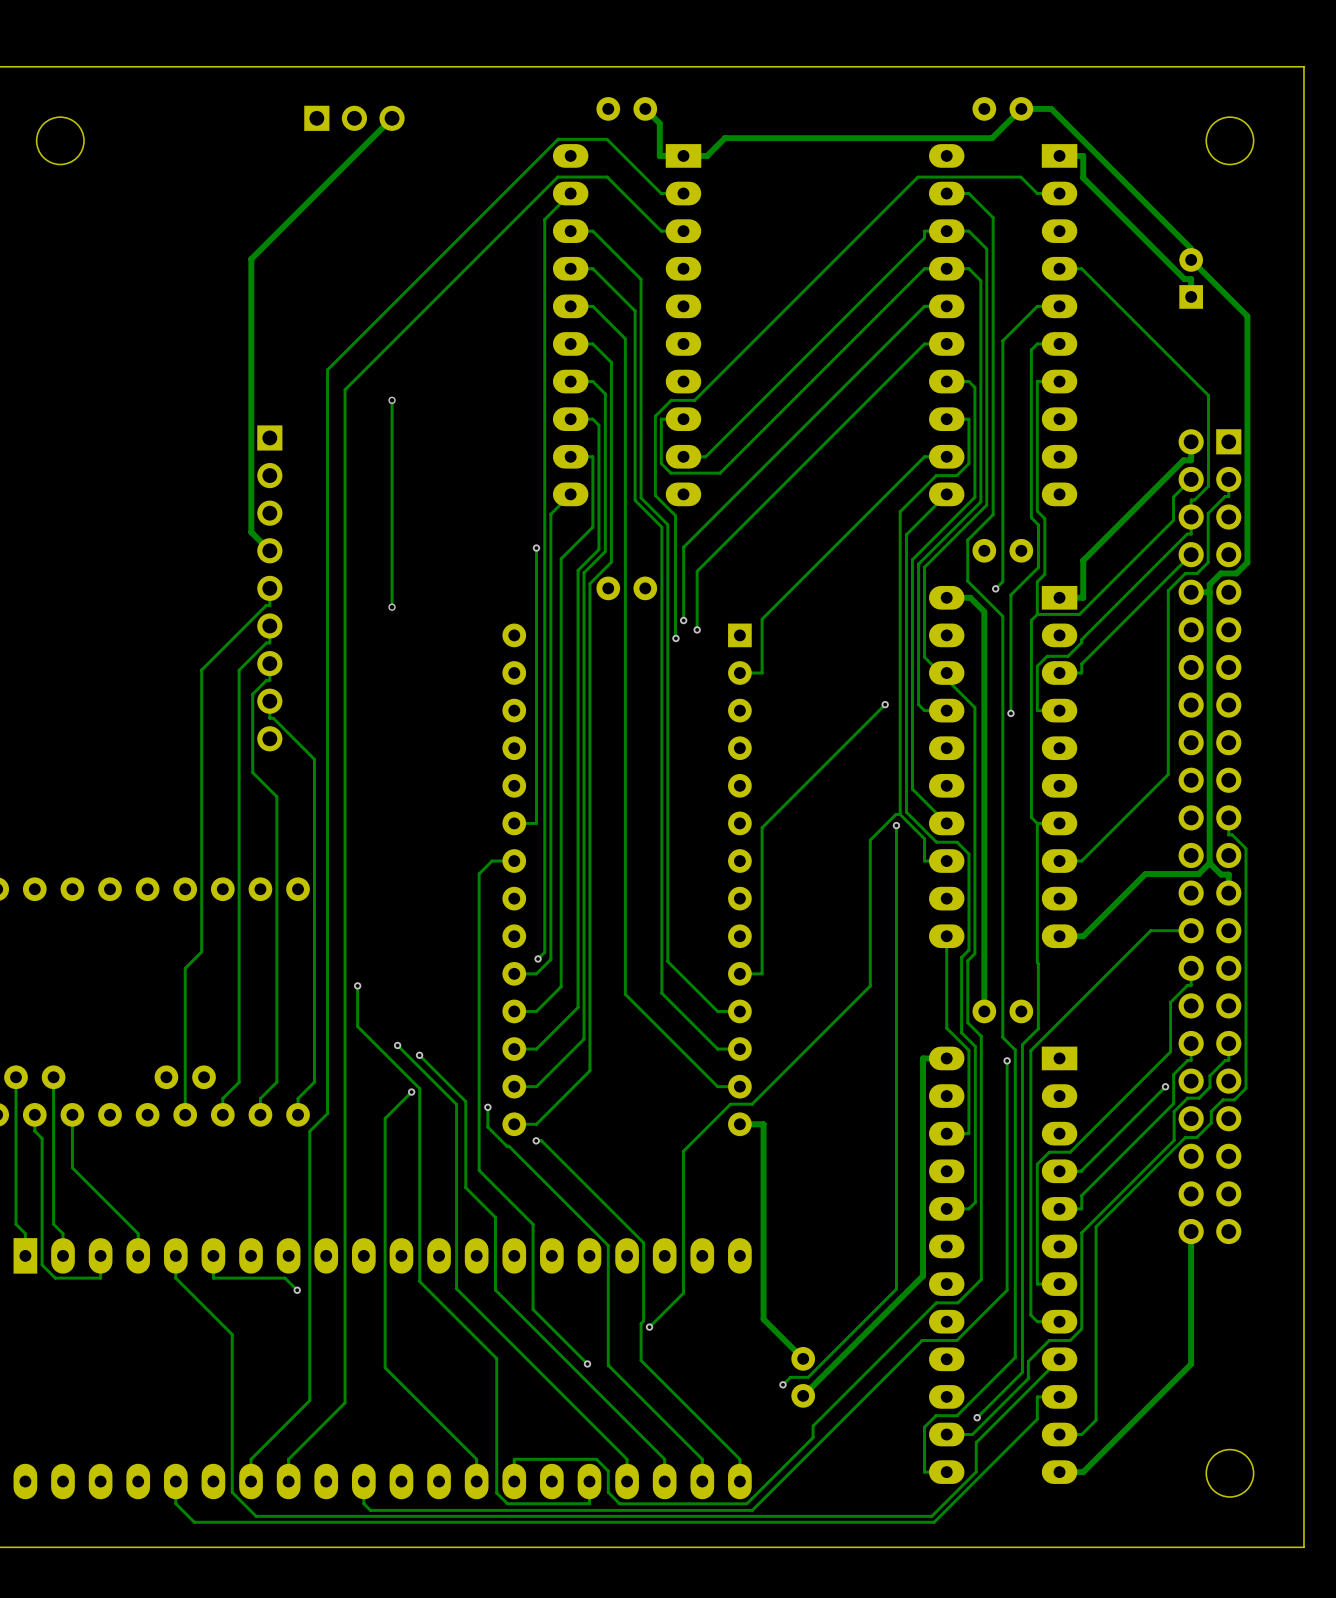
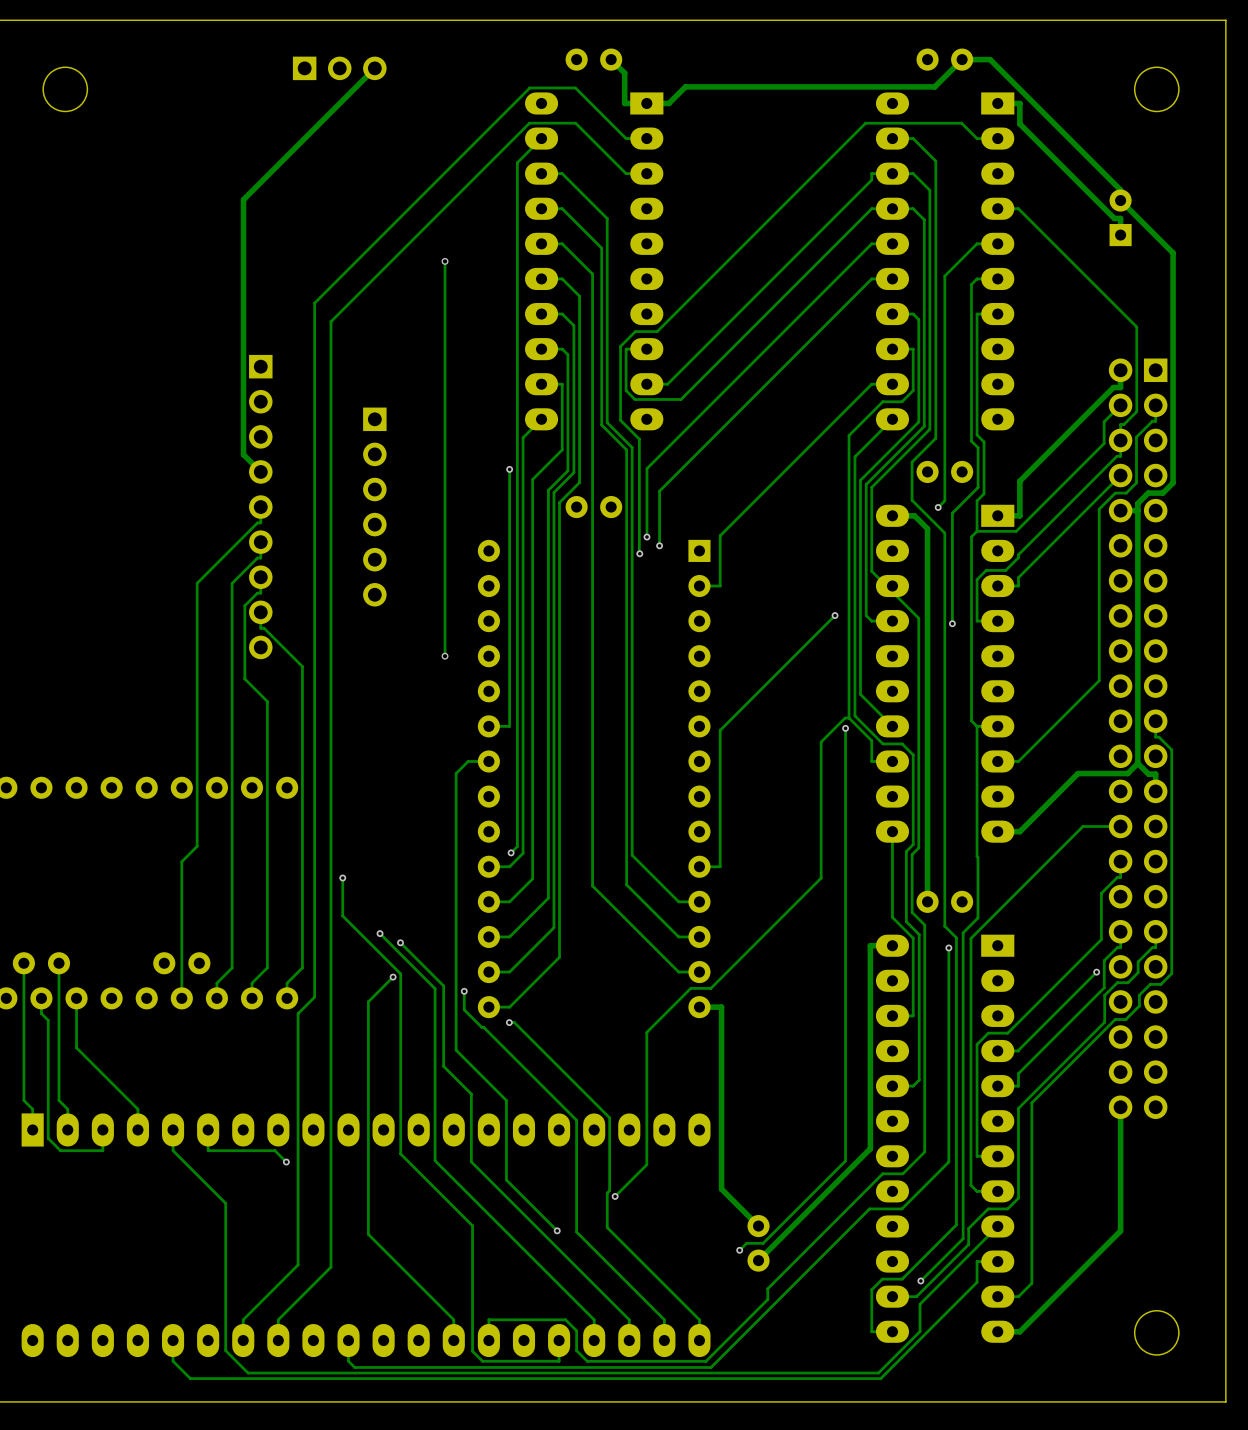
track: none -> (445, 261) (445, 656)
via: none -> (445, 261)
track: (392, 400) (392, 607) -> none
via: (392, 400) -> none
part: none -> (374, 507)
via: (392, 607) -> none
via: none -> (445, 656)

